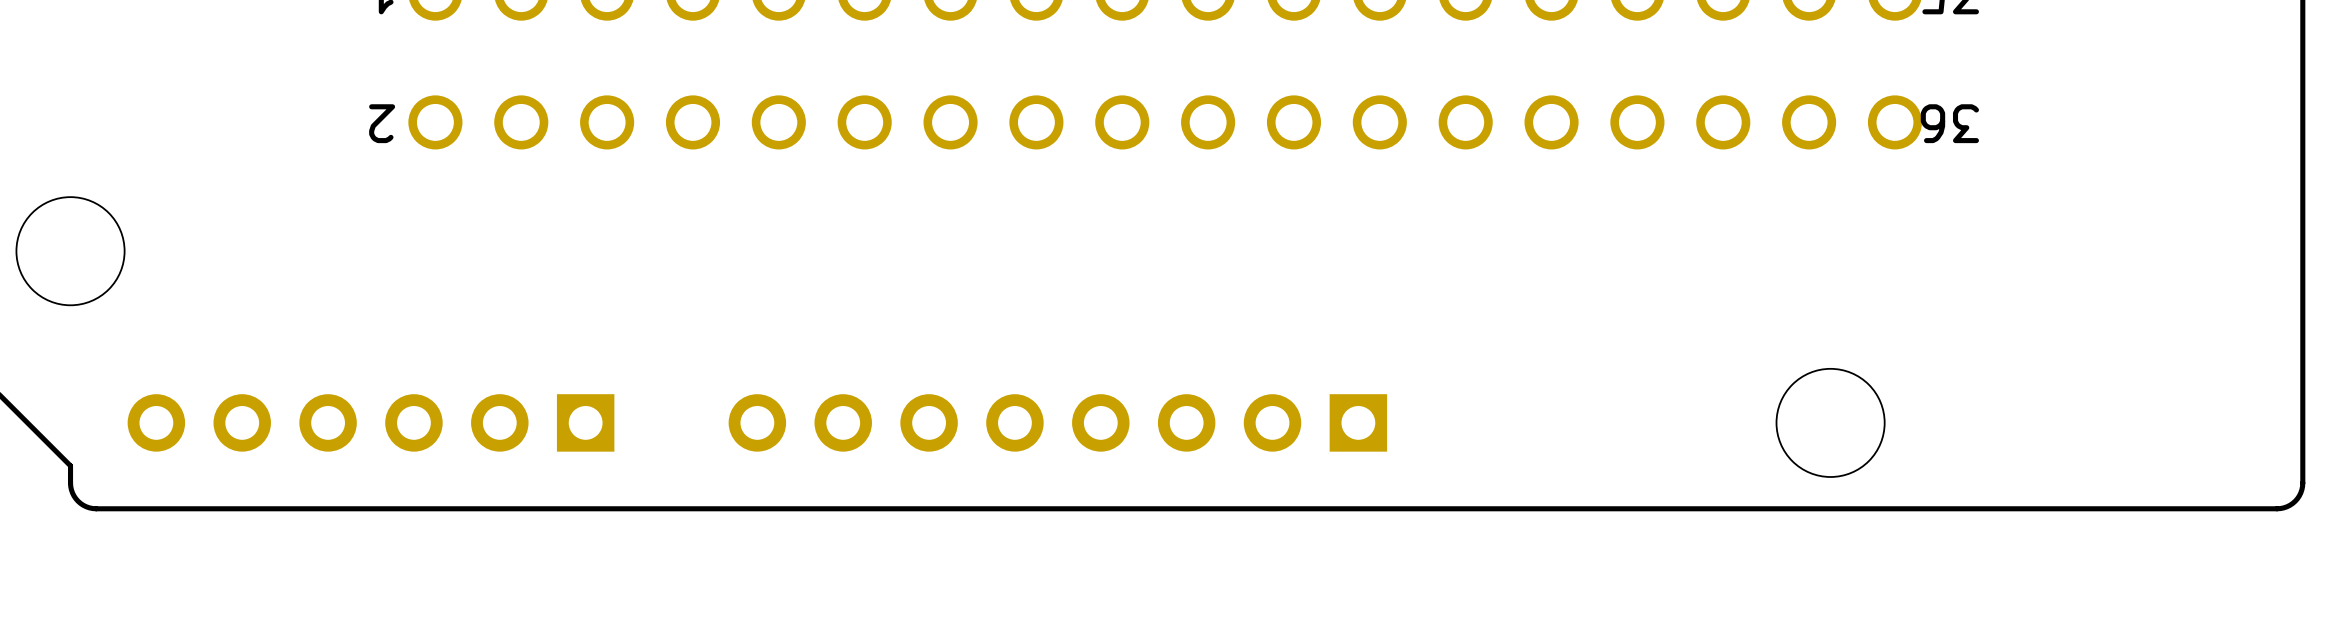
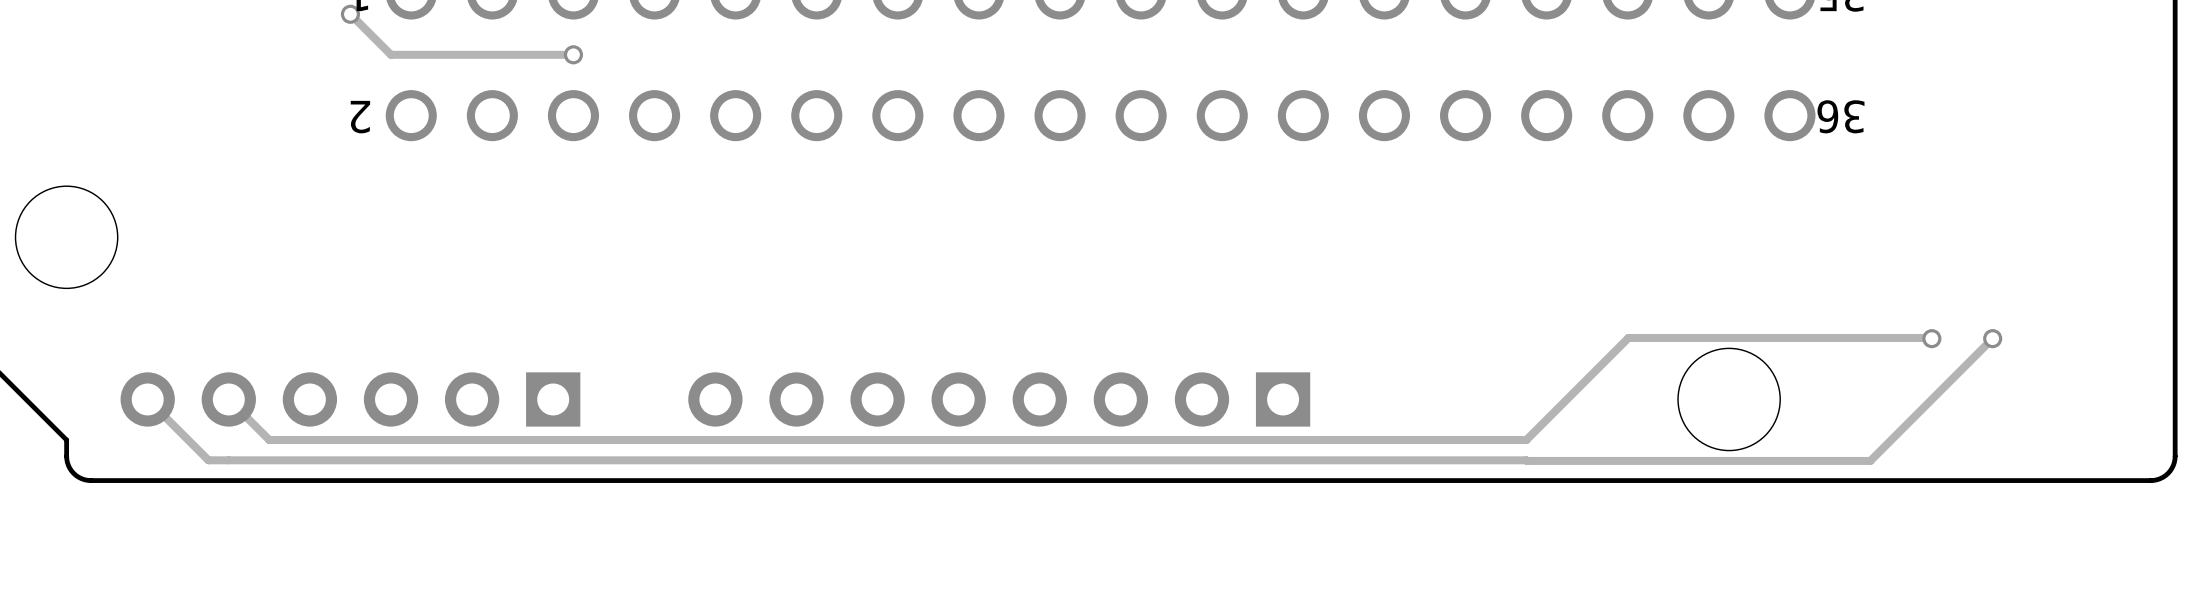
track: none -> (350, 14) (391, 54) (573, 54)
via: none -> (350, 14)
via: none -> (573, 54)
track: none -> (1931, 338) (1628, 338) (1526, 440) (269, 440) (228, 399)
via: none -> (1931, 338)
track: none -> (1992, 338) (1870, 460) (208, 460) (147, 399)
via: none -> (1992, 338)

